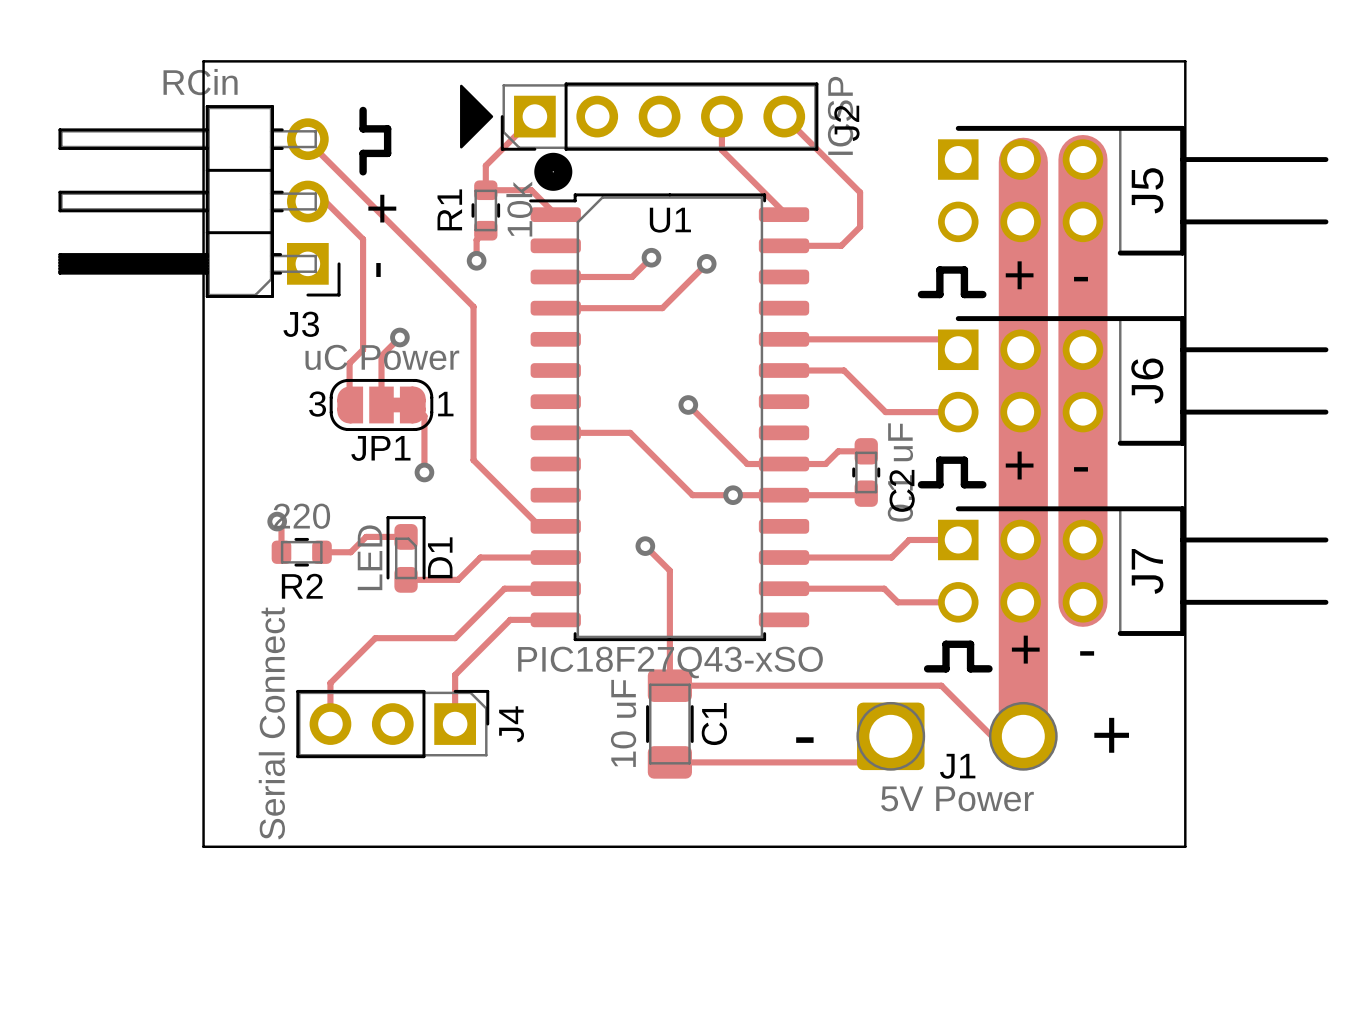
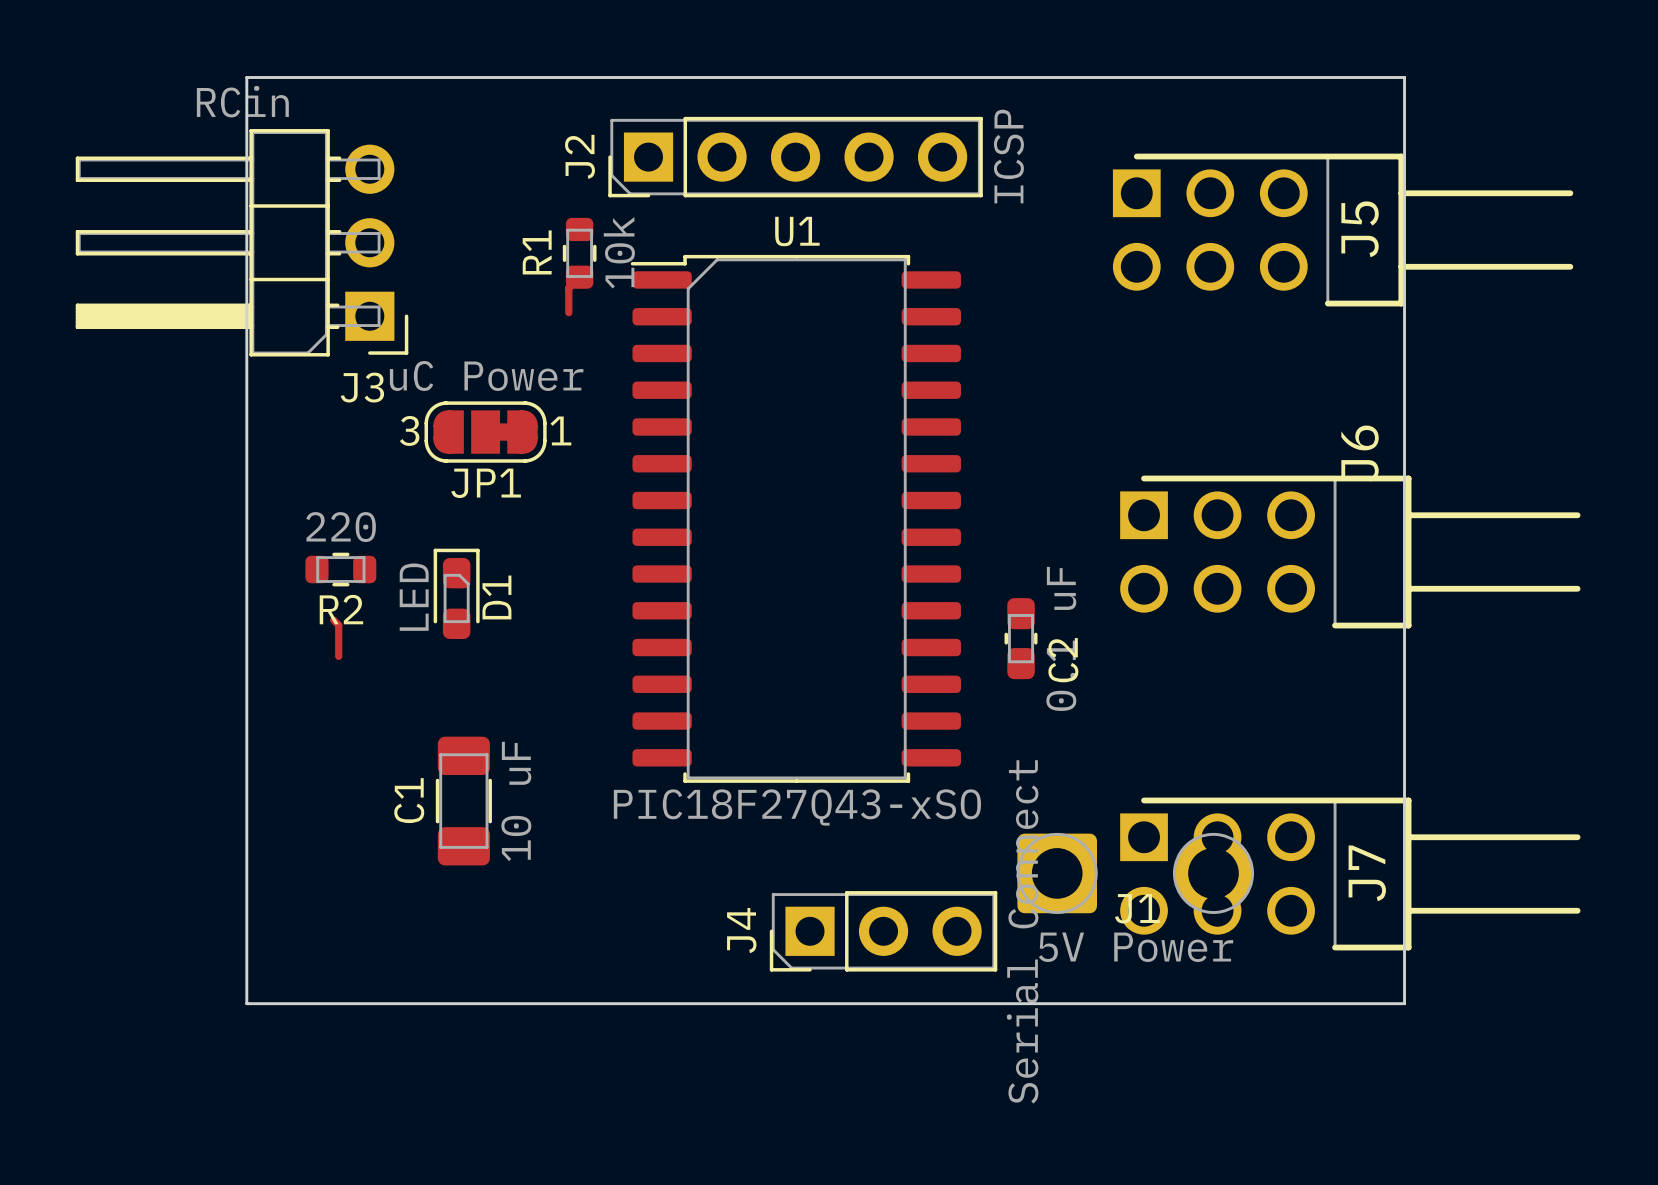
drawing: [460, 84, 494, 149] -> none
line: (363, 110) (363, 128) (387, 128) (387, 153) (363, 153) (363, 171) -> none
track: (534, 116) (485, 165) (485, 190) (531, 190) (555, 214) -> none
J2 position: (659, 116) -> (795, 157)
track: (721, 116) (721, 150) (784, 212) (784, 214) -> none
track: (784, 116) (860, 192) (860, 227) (841, 245) (784, 245) -> none
J2 name position: J2 (846, 123) -> J2 (580, 156)
track: (307, 141) (473, 306) (473, 460) (539, 526) (555, 526) -> none
drawing: [534, 152, 573, 191] -> none
track: (1020, 159) (1023, 162) (1023, 736) (992, 736) (941, 685) (669, 685) (669, 570) (645, 546) -> none
track: (1082, 159) (1082, 602) -> none
track: (307, 201) (325, 201) (363, 239) (363, 349) (349, 363) (349, 404) -> none
text: + (382, 208) -> none
U1 name position: U1 (670, 220) -> U1 (797, 231)
track: (651, 257) (632, 276) (555, 276) -> none
via: (651, 257) -> none
via: (476, 260) -> none
track: (706, 263) (662, 308) (555, 308) -> none
via: (706, 263) -> none
text: - (378, 269) -> none
text: + (1019, 275) -> none
text: - (1081, 279) -> none
line: (921, 294) (939, 294) (939, 269) (964, 269) (964, 294) (982, 294) -> none
track: (399, 337) (381, 355) (381, 404) -> none
via: (399, 337) -> none
track: (784, 339) (947, 339) (958, 349) -> none
track: (784, 370) (844, 370) (885, 412) (958, 412) -> none
J6 position: (1133, 380) -> (1350, 552)
JP1 position: (381, 404) -> (485, 432)
track: (413, 404) (424, 416) (424, 472) -> none
track: (688, 404) (747, 464) (825, 464) (838, 451) (866, 451) -> none
via: (688, 404) -> none
U1 position: (669, 417) -> (795, 518)
track: (555, 432) (630, 432) (692, 495) (864, 495) (866, 493) -> none
text: + (1019, 465) -> none
text: - (1081, 469) -> none
via: (424, 472) -> none
C2 position: (866, 472) -> (1021, 638)
line: (921, 484) (939, 484) (939, 460) (964, 460) (964, 484) (982, 484) -> none
via: (733, 495) -> none
via: (277, 521) -> none
track: (406, 536) (366, 536) (350, 552) (321, 552) -> none
track: (958, 539) (909, 539) (891, 557) (784, 557) -> none
via: (645, 546) -> none
R2 position: (301, 552) -> (340, 569)
D1 position: (406, 554) -> (456, 593)
track: (555, 557) (480, 557) (458, 579) (406, 579) -> none
J7 position: (1133, 571) -> (1350, 874)
track: (555, 588) (504, 588) (455, 638) (375, 638) (330, 683) (330, 724) -> none
track: (784, 588) (884, 588) (897, 602) (958, 602) -> none
track: (555, 619) (510, 619) (455, 674) (455, 724) -> none
text: + (1025, 649) -> none
text: - (1087, 653) -> none
line: (927, 668) (946, 668) (946, 644) (970, 644) (970, 668) (988, 668) -> none
C1 value position: 10 uF (623, 723) -> 10 uF (516, 801)
J4 rotation: 0° (392, 724) -> 180° (883, 931)
J4 position: (392, 724) -> (883, 931)
C1 position: (669, 724) -> (463, 801)
C1 name position: C1 (714, 724) -> C1 (409, 800)
text: + (1111, 735) -> none
track: (890, 736) (864, 762) (669, 762) -> none
text: - (804, 740) -> none

